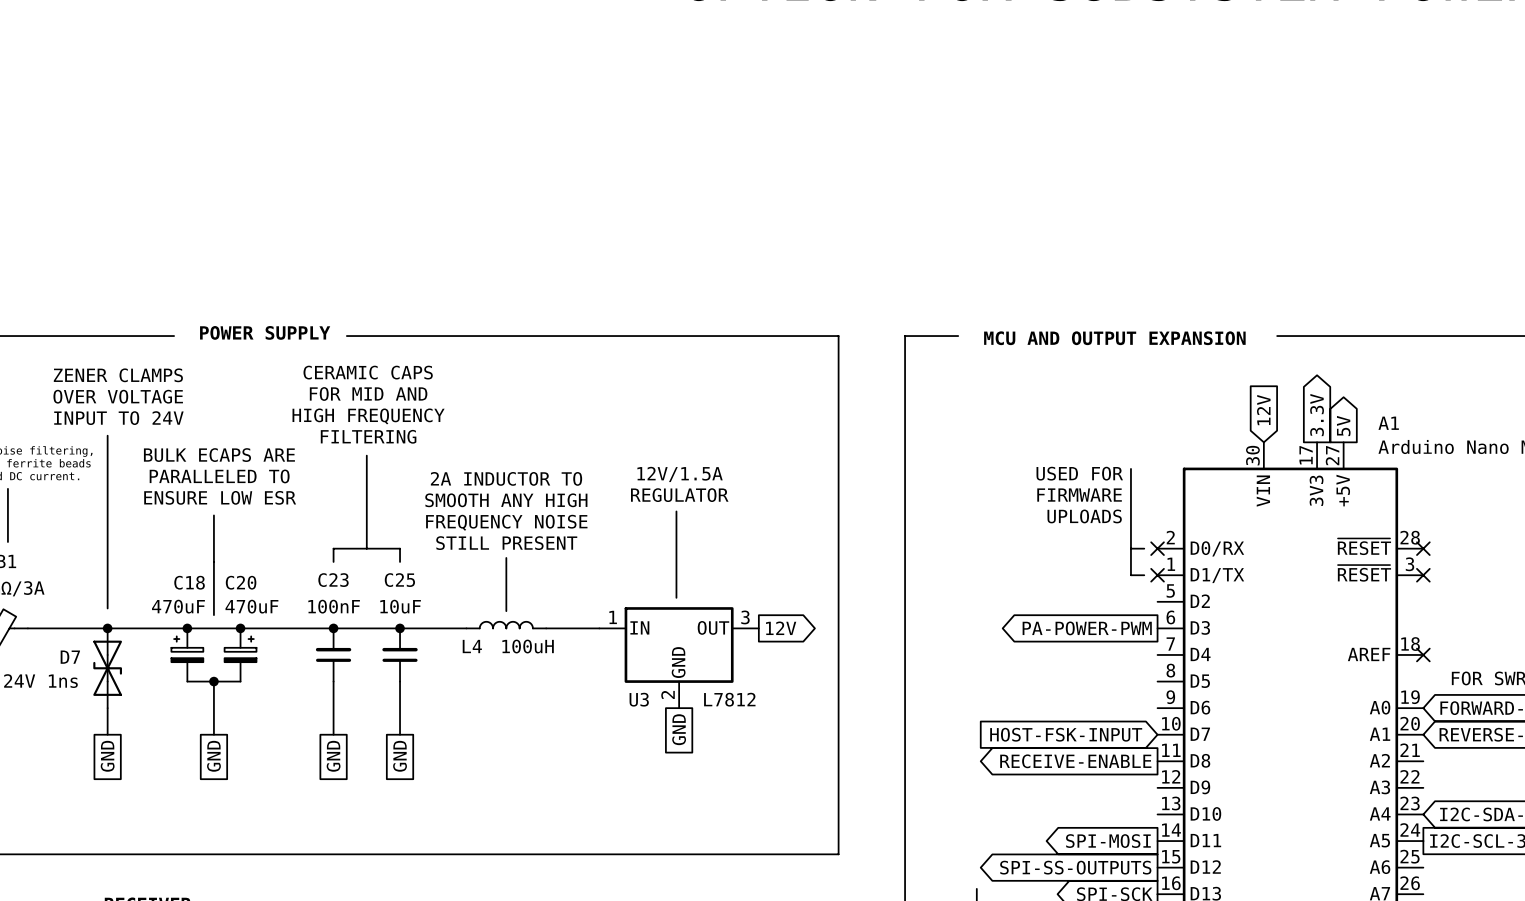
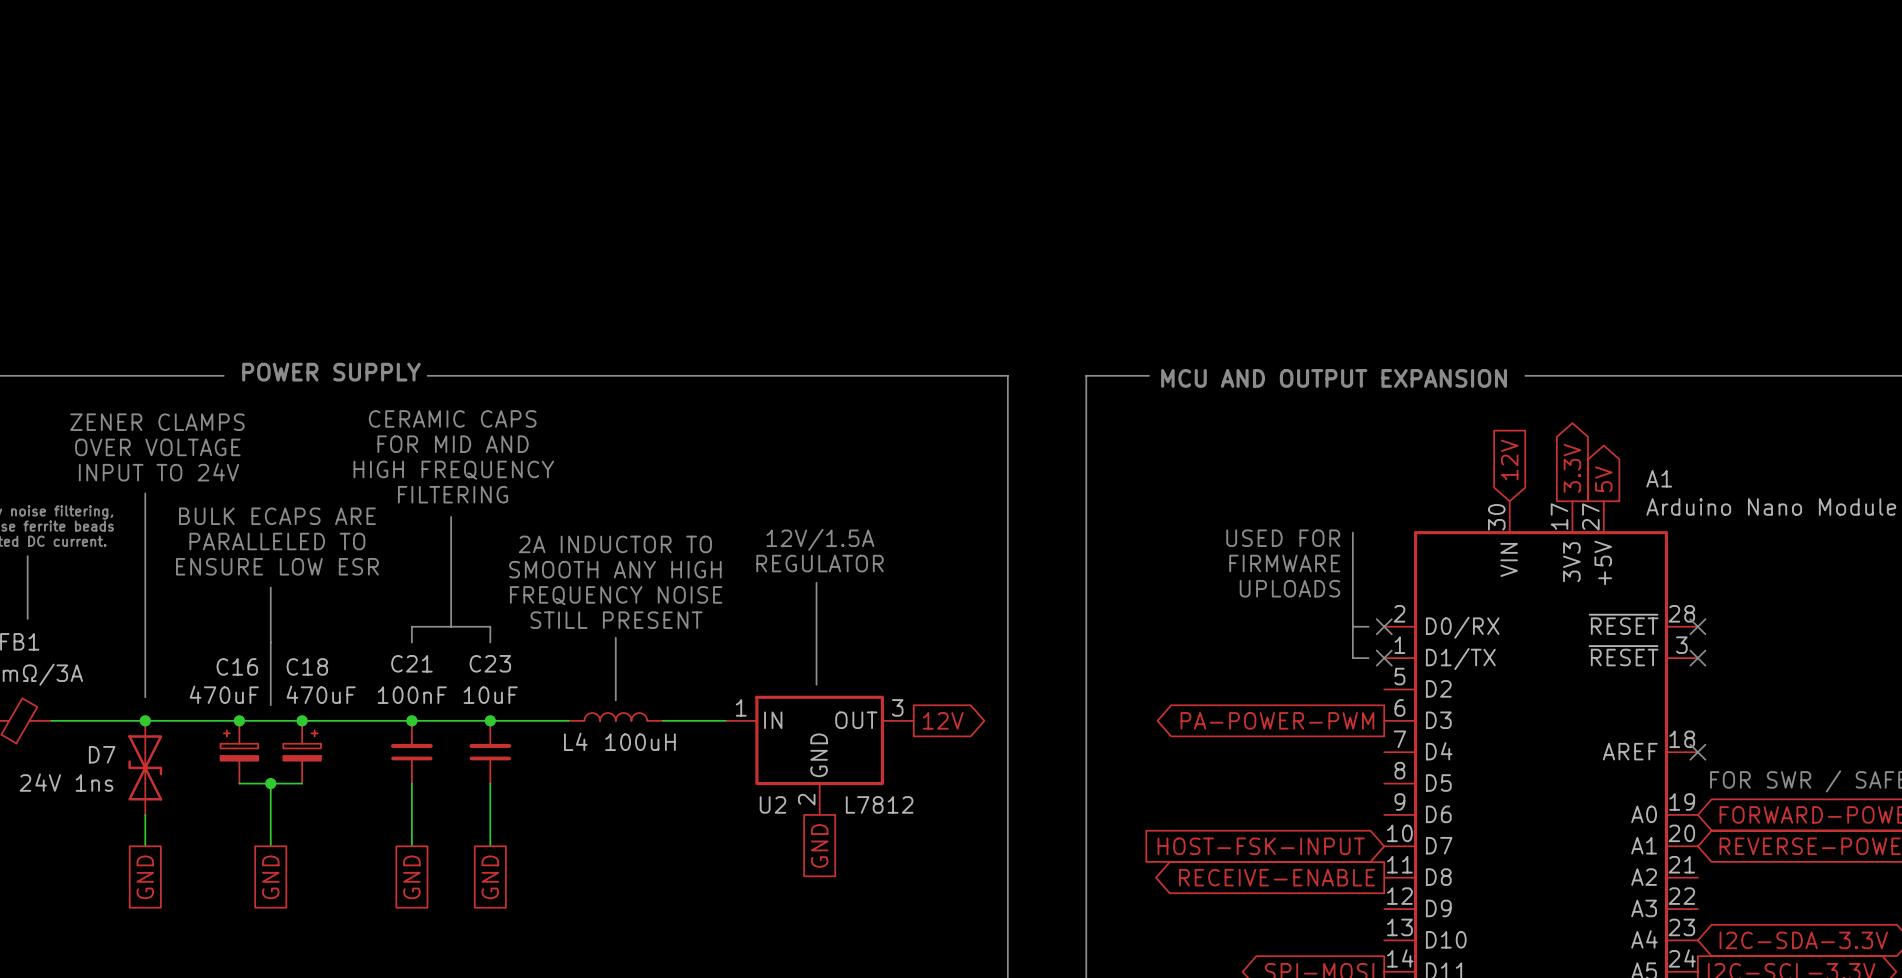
C23 name: C23 (333, 580) -> C21 (411, 663)
C25 name: C25 (399, 580) -> C23 (490, 663)
C18 name: C18 (189, 582) -> C16 (237, 666)
C20 name: C20 (241, 582) -> C18 (307, 666)
U3 name: U3 (639, 699) -> U2 (772, 804)

